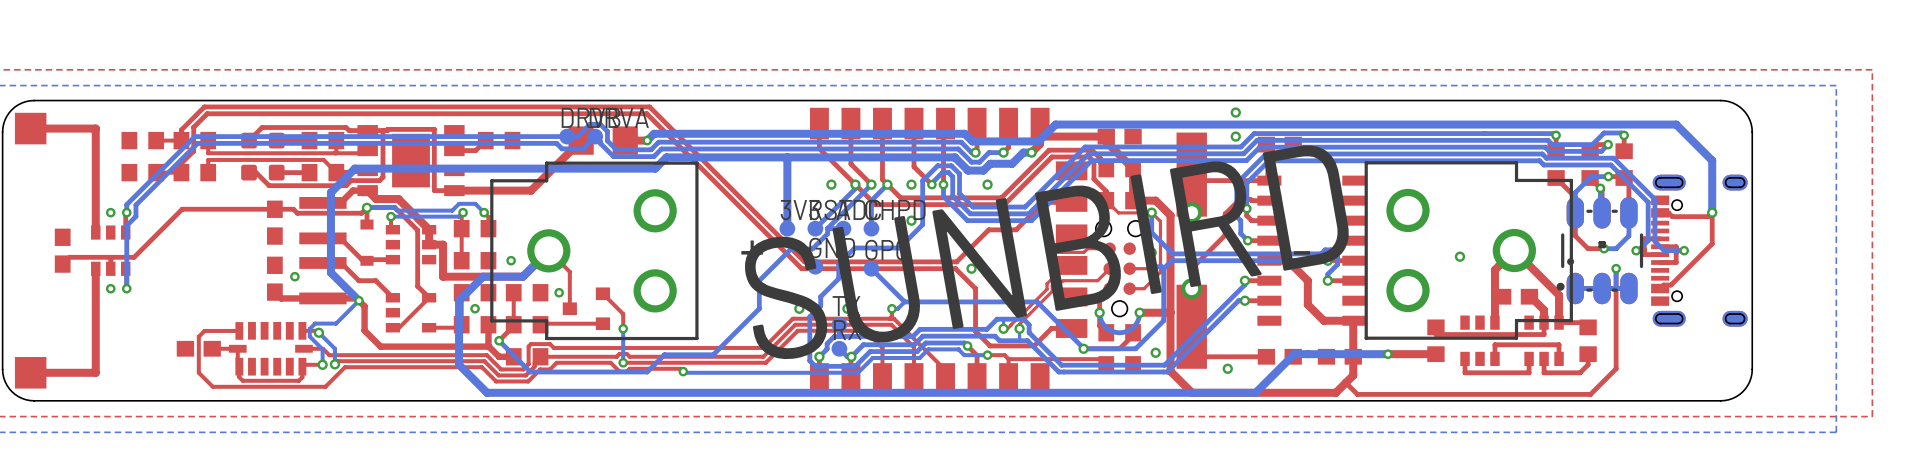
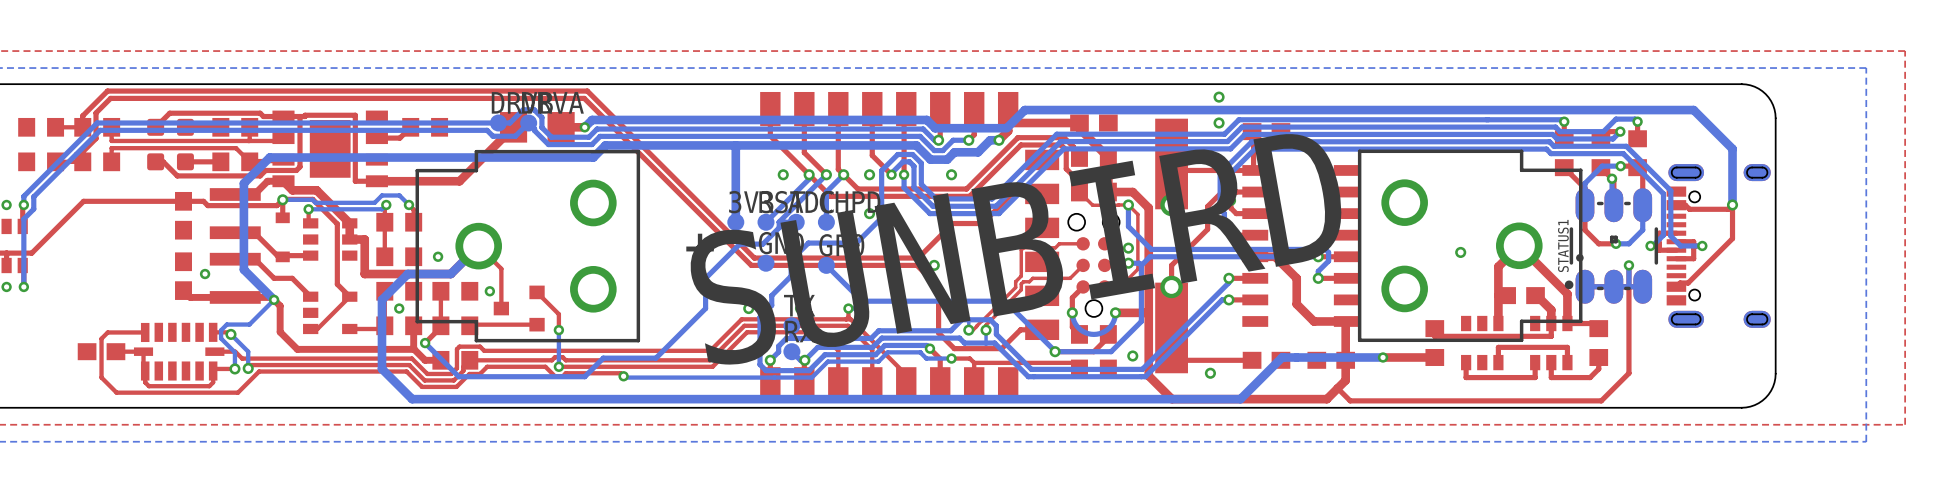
STATUS1 name: none -> STATUS1 (1563, 245)

